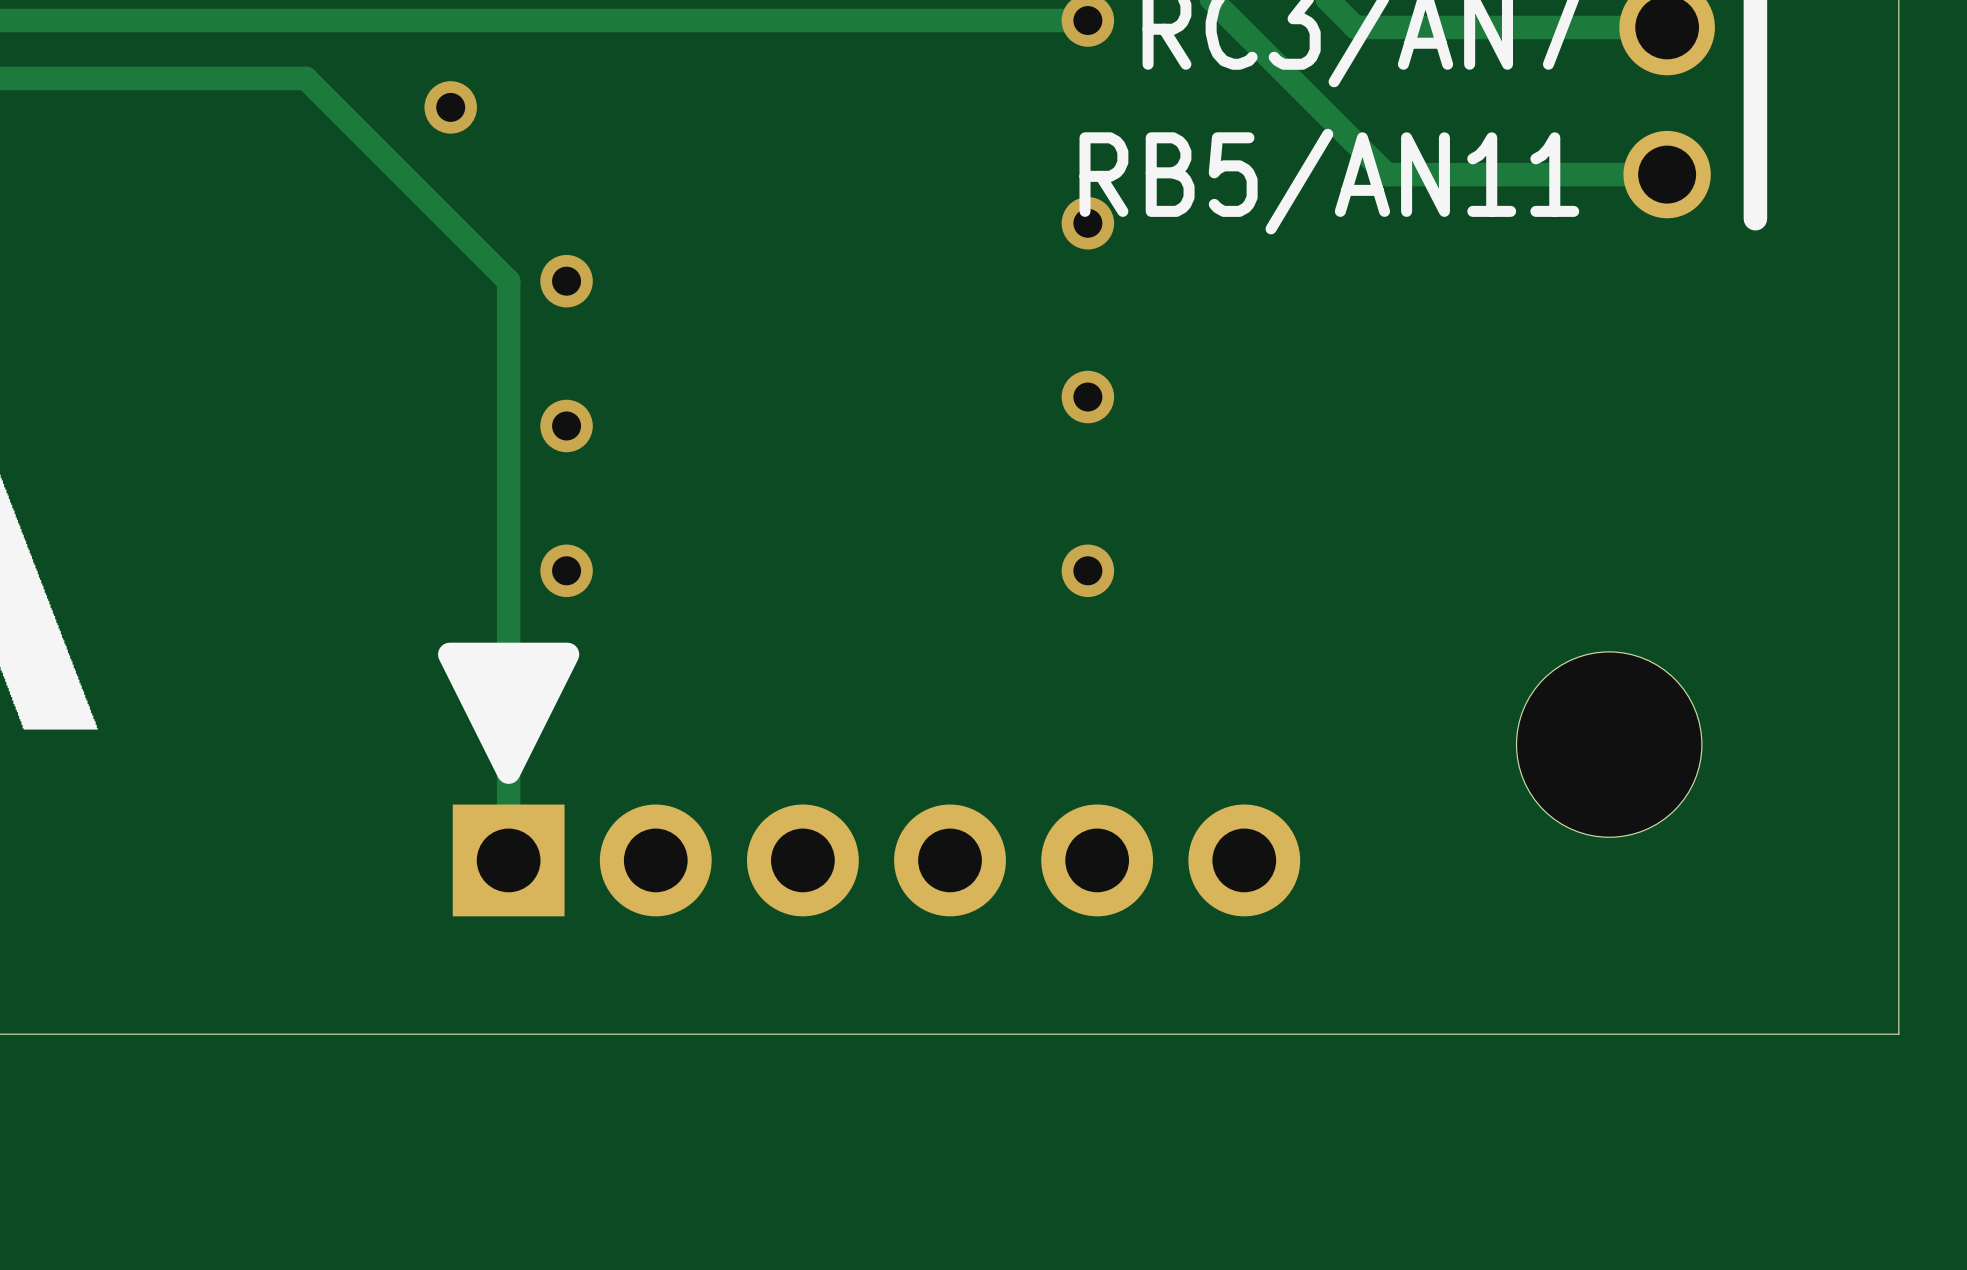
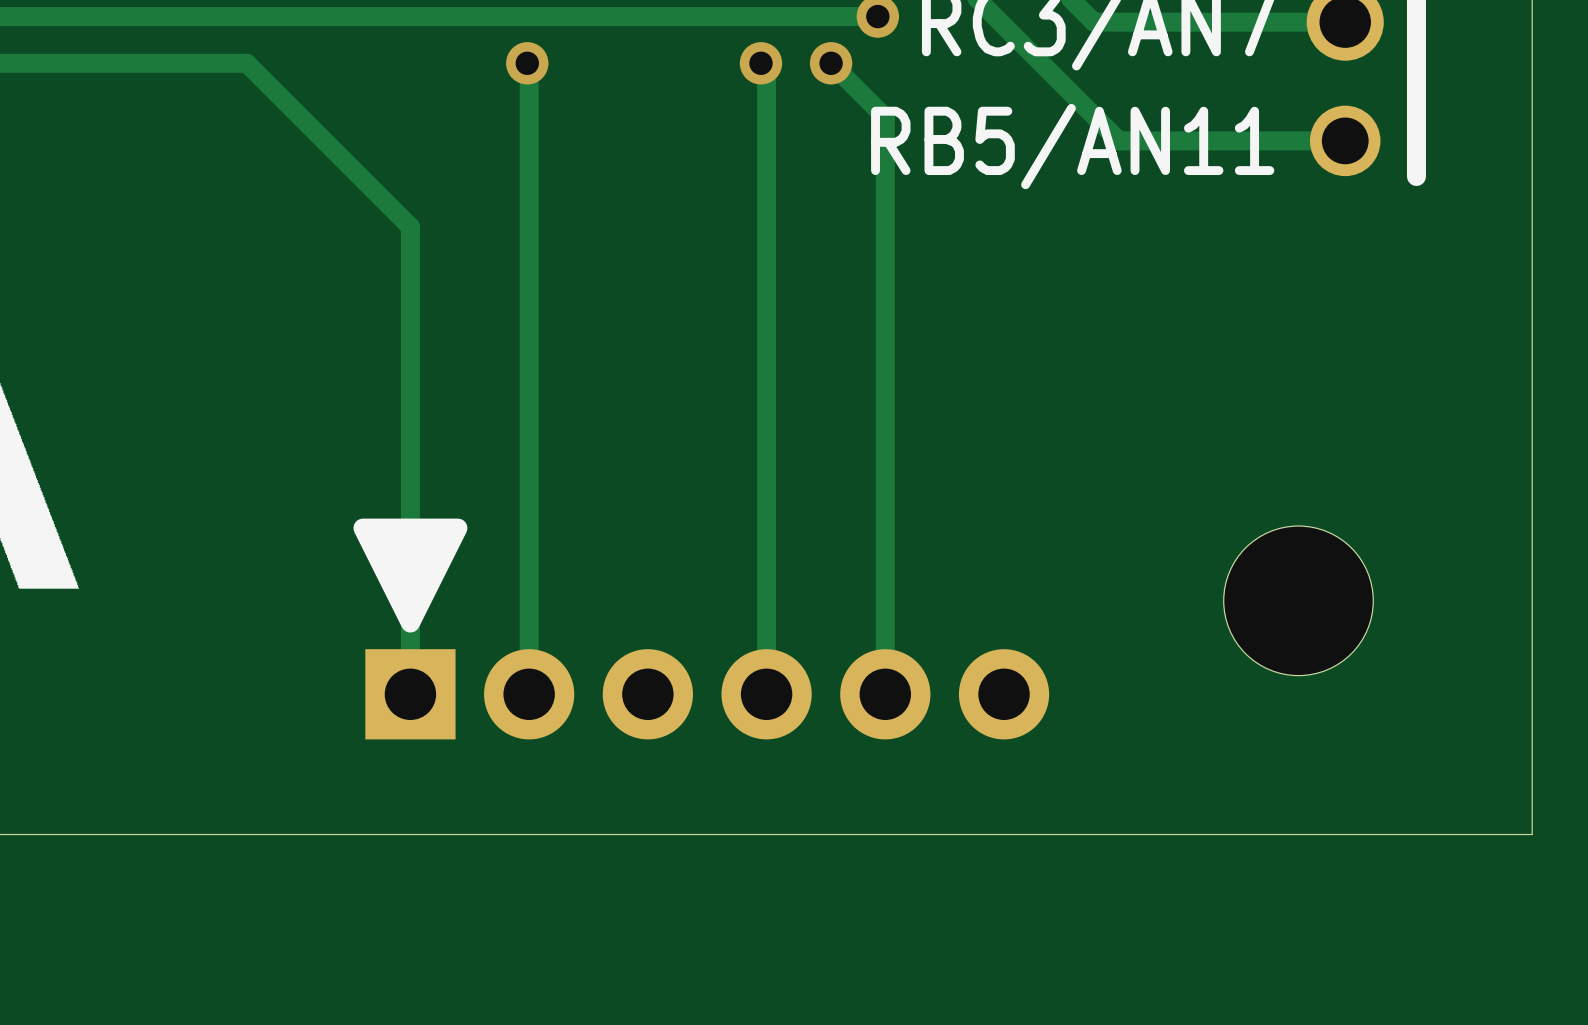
track: none -> (527, 63) (529, 65) (529, 694)
via: none -> (527, 63)
track: none -> (760, 63) (766, 68) (766, 694)
via: none -> (760, 63)
track: none -> (831, 63) (885, 117) (885, 694)
via: none -> (831, 63)
via: (450, 107) -> none
via: (1087, 223) -> none
via: (566, 281) -> none
via: (1087, 397) -> none
via: (566, 425) -> none
via: (566, 570) -> none
via: (1087, 570) -> none

